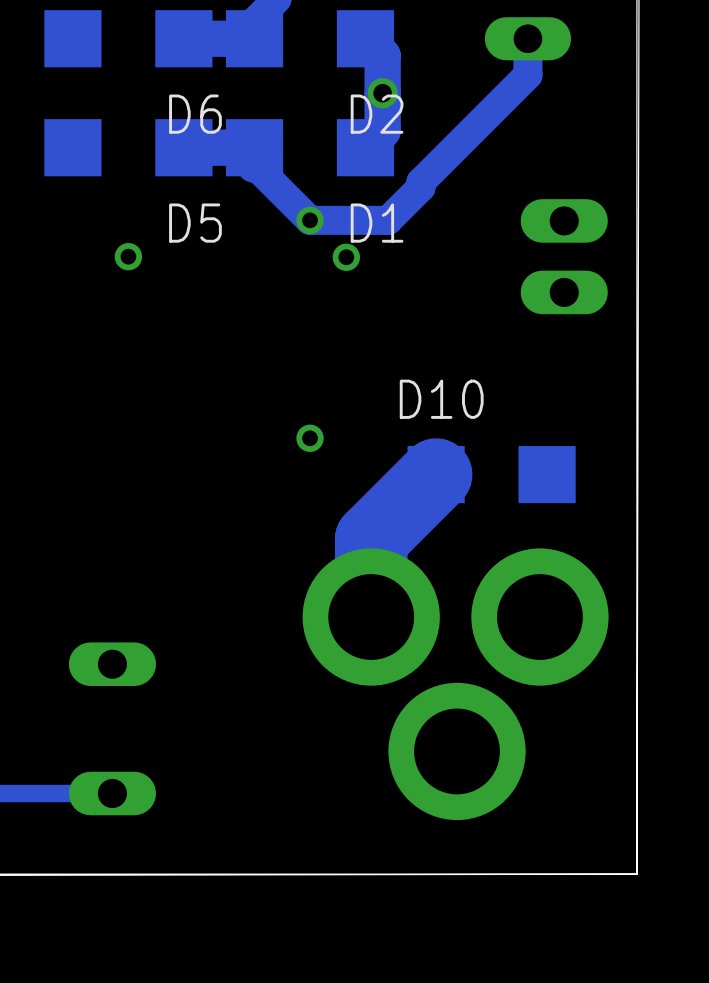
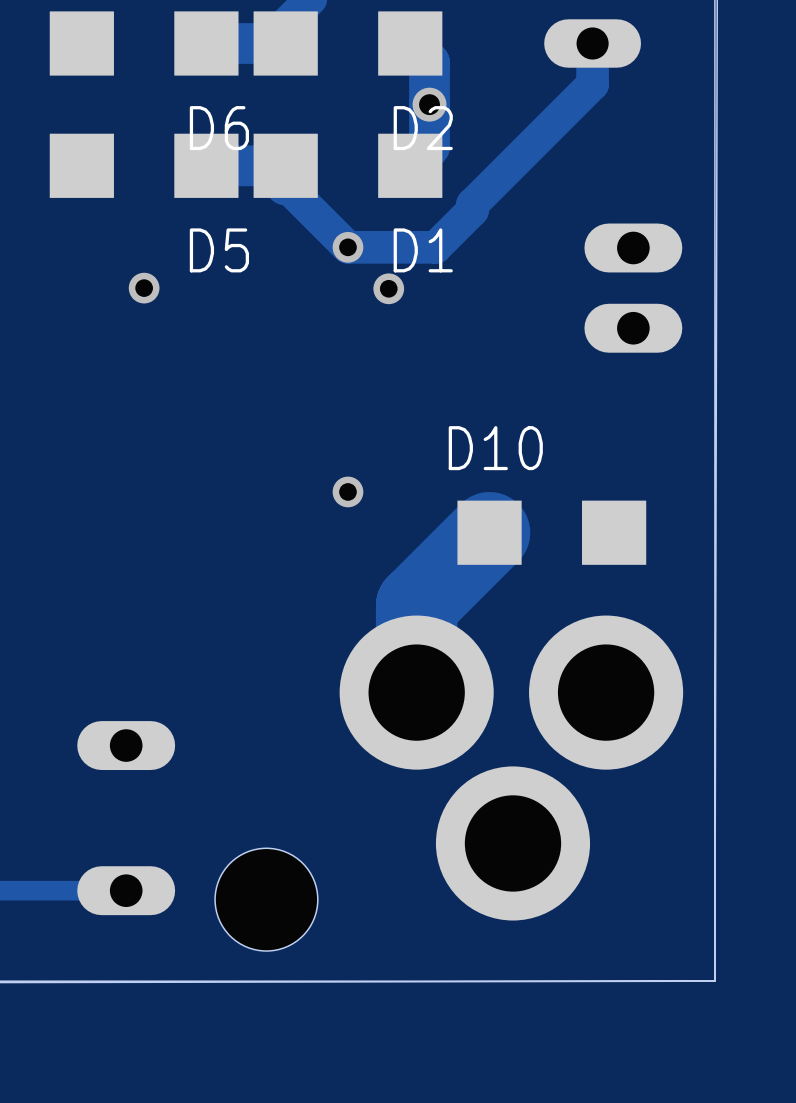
hole: none -> (266, 899)

